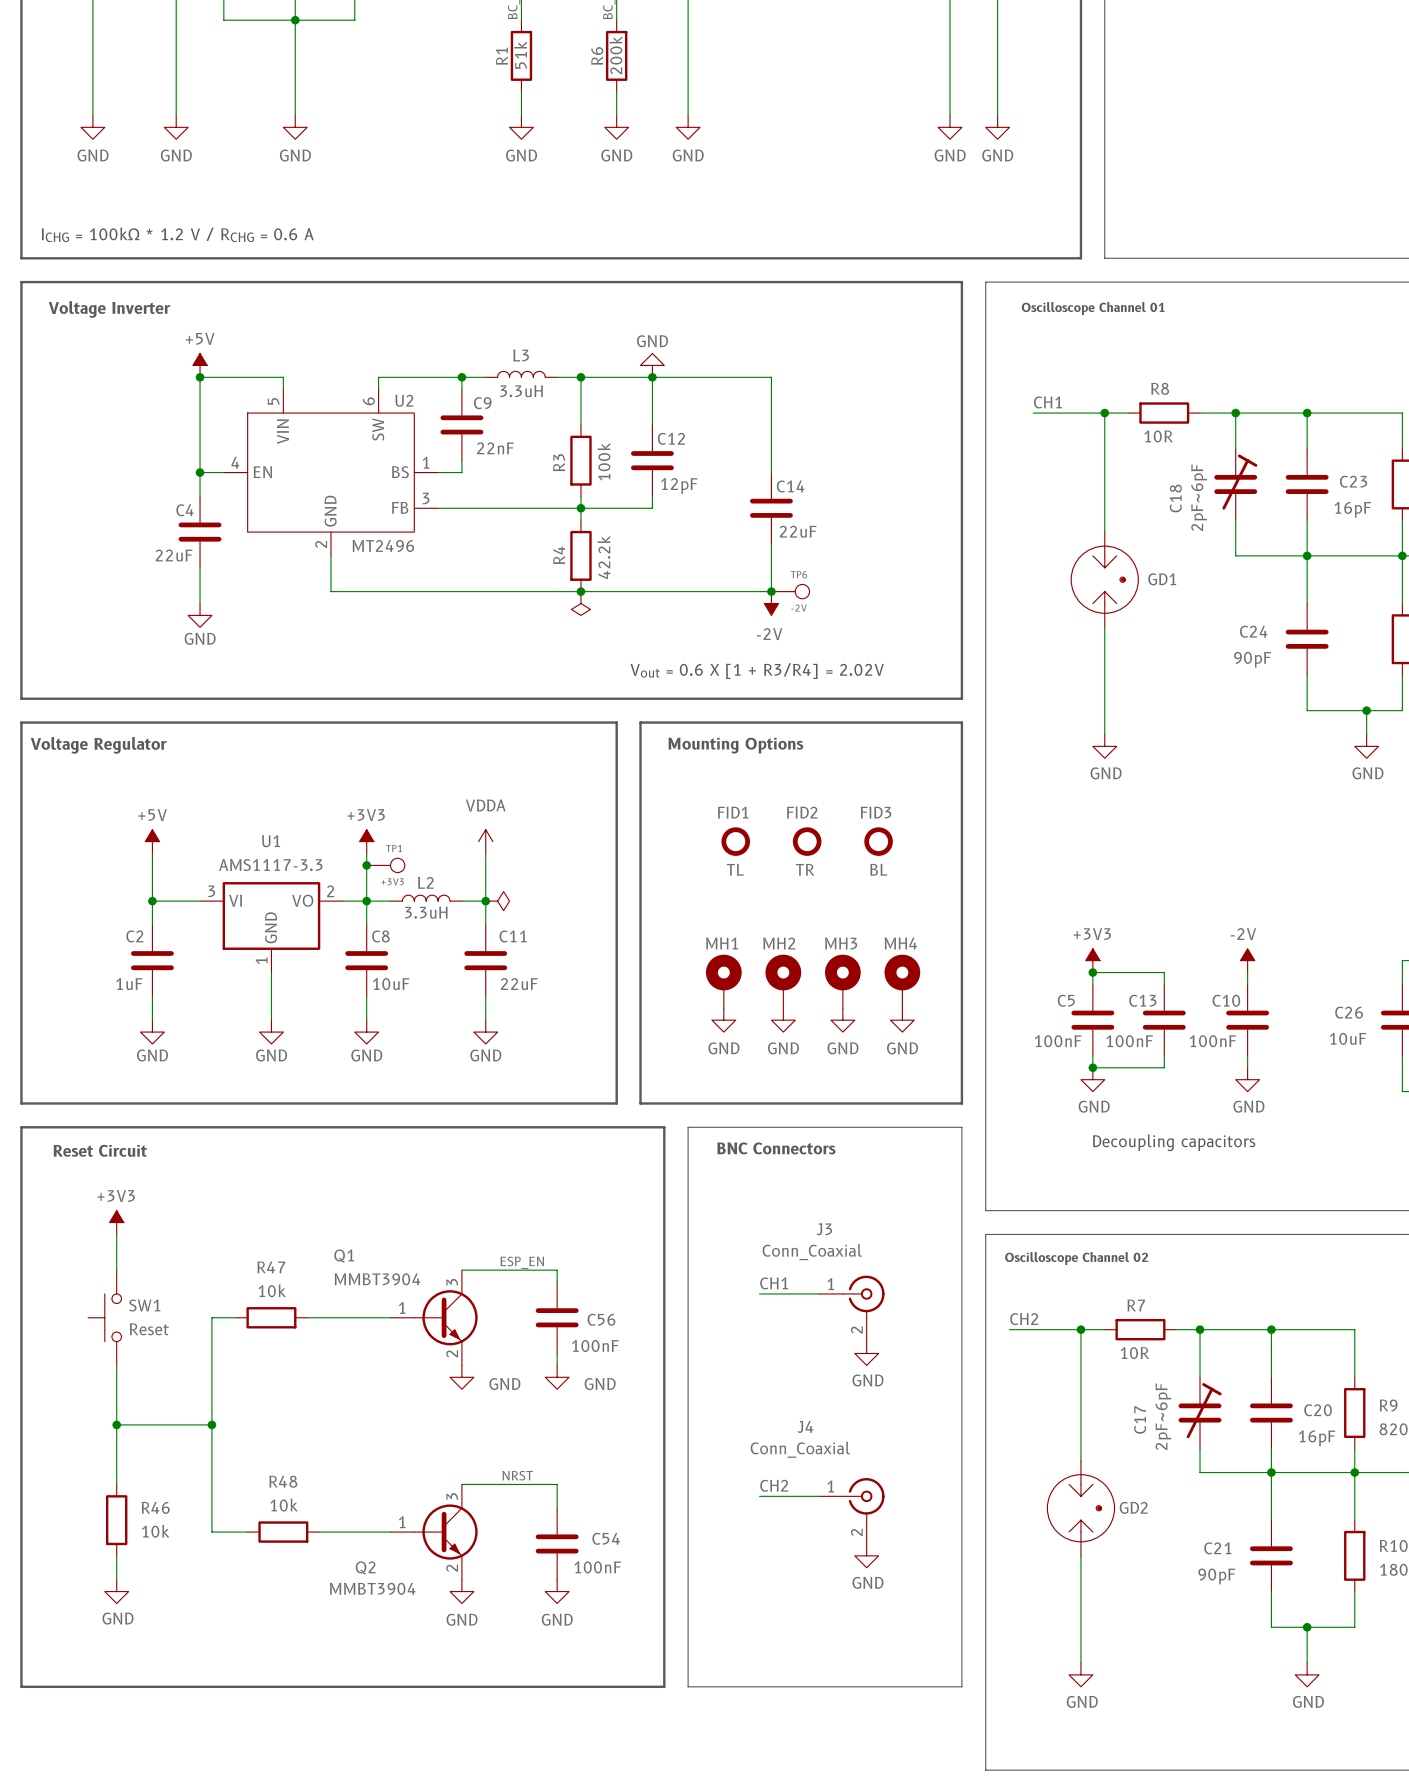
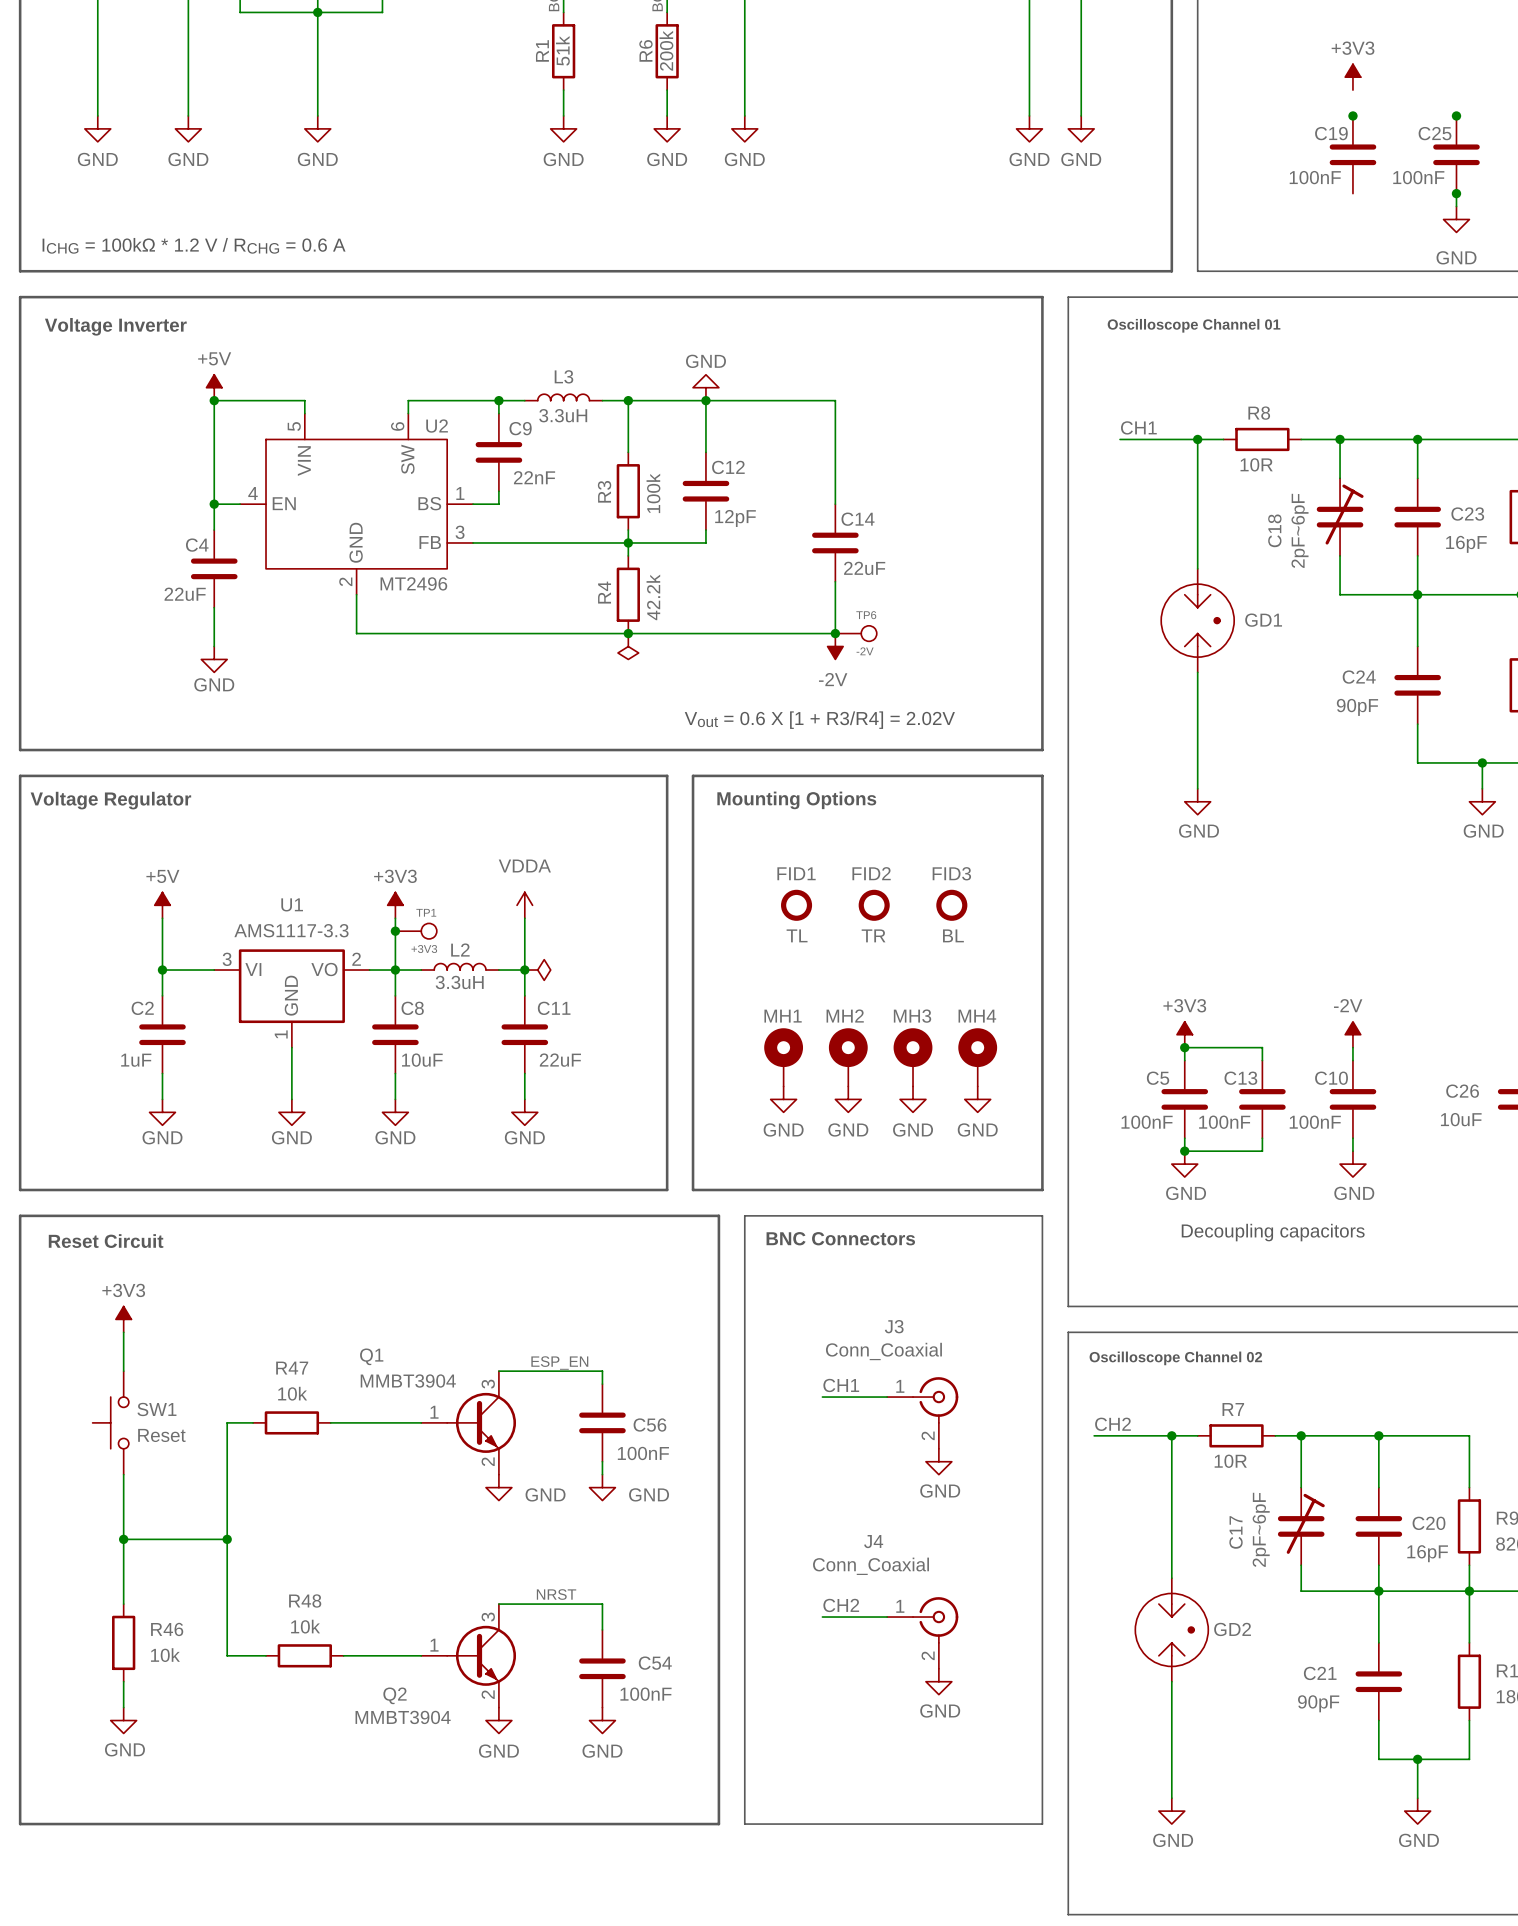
power symbol: none -> +3V3 (1352, 77)
junction: none -> (1352, 115)
junction: none -> (1456, 115)
C19: none -> 100nF (1352, 154)
C25: none -> 100nF (1456, 154)
wire: none -> (1456, 193) (1456, 206)
junction: none -> (1456, 193)
power symbol: none -> GND (1456, 219)

